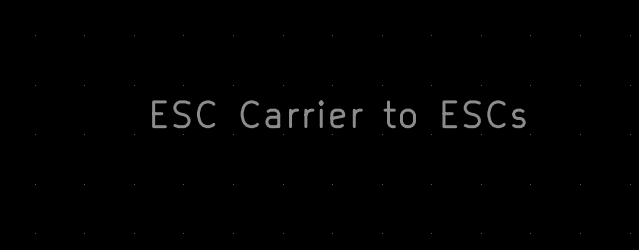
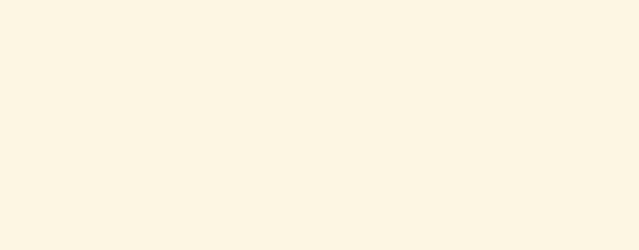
text: ESC Carrier to ESCs (338, 114) -> none

